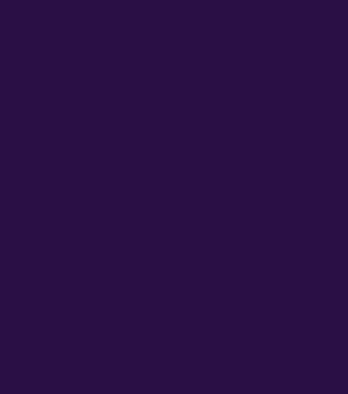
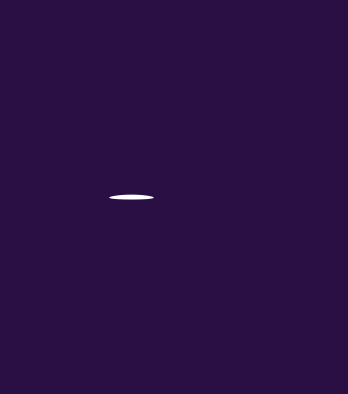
drawing: none -> [109, 194, 154, 200]

